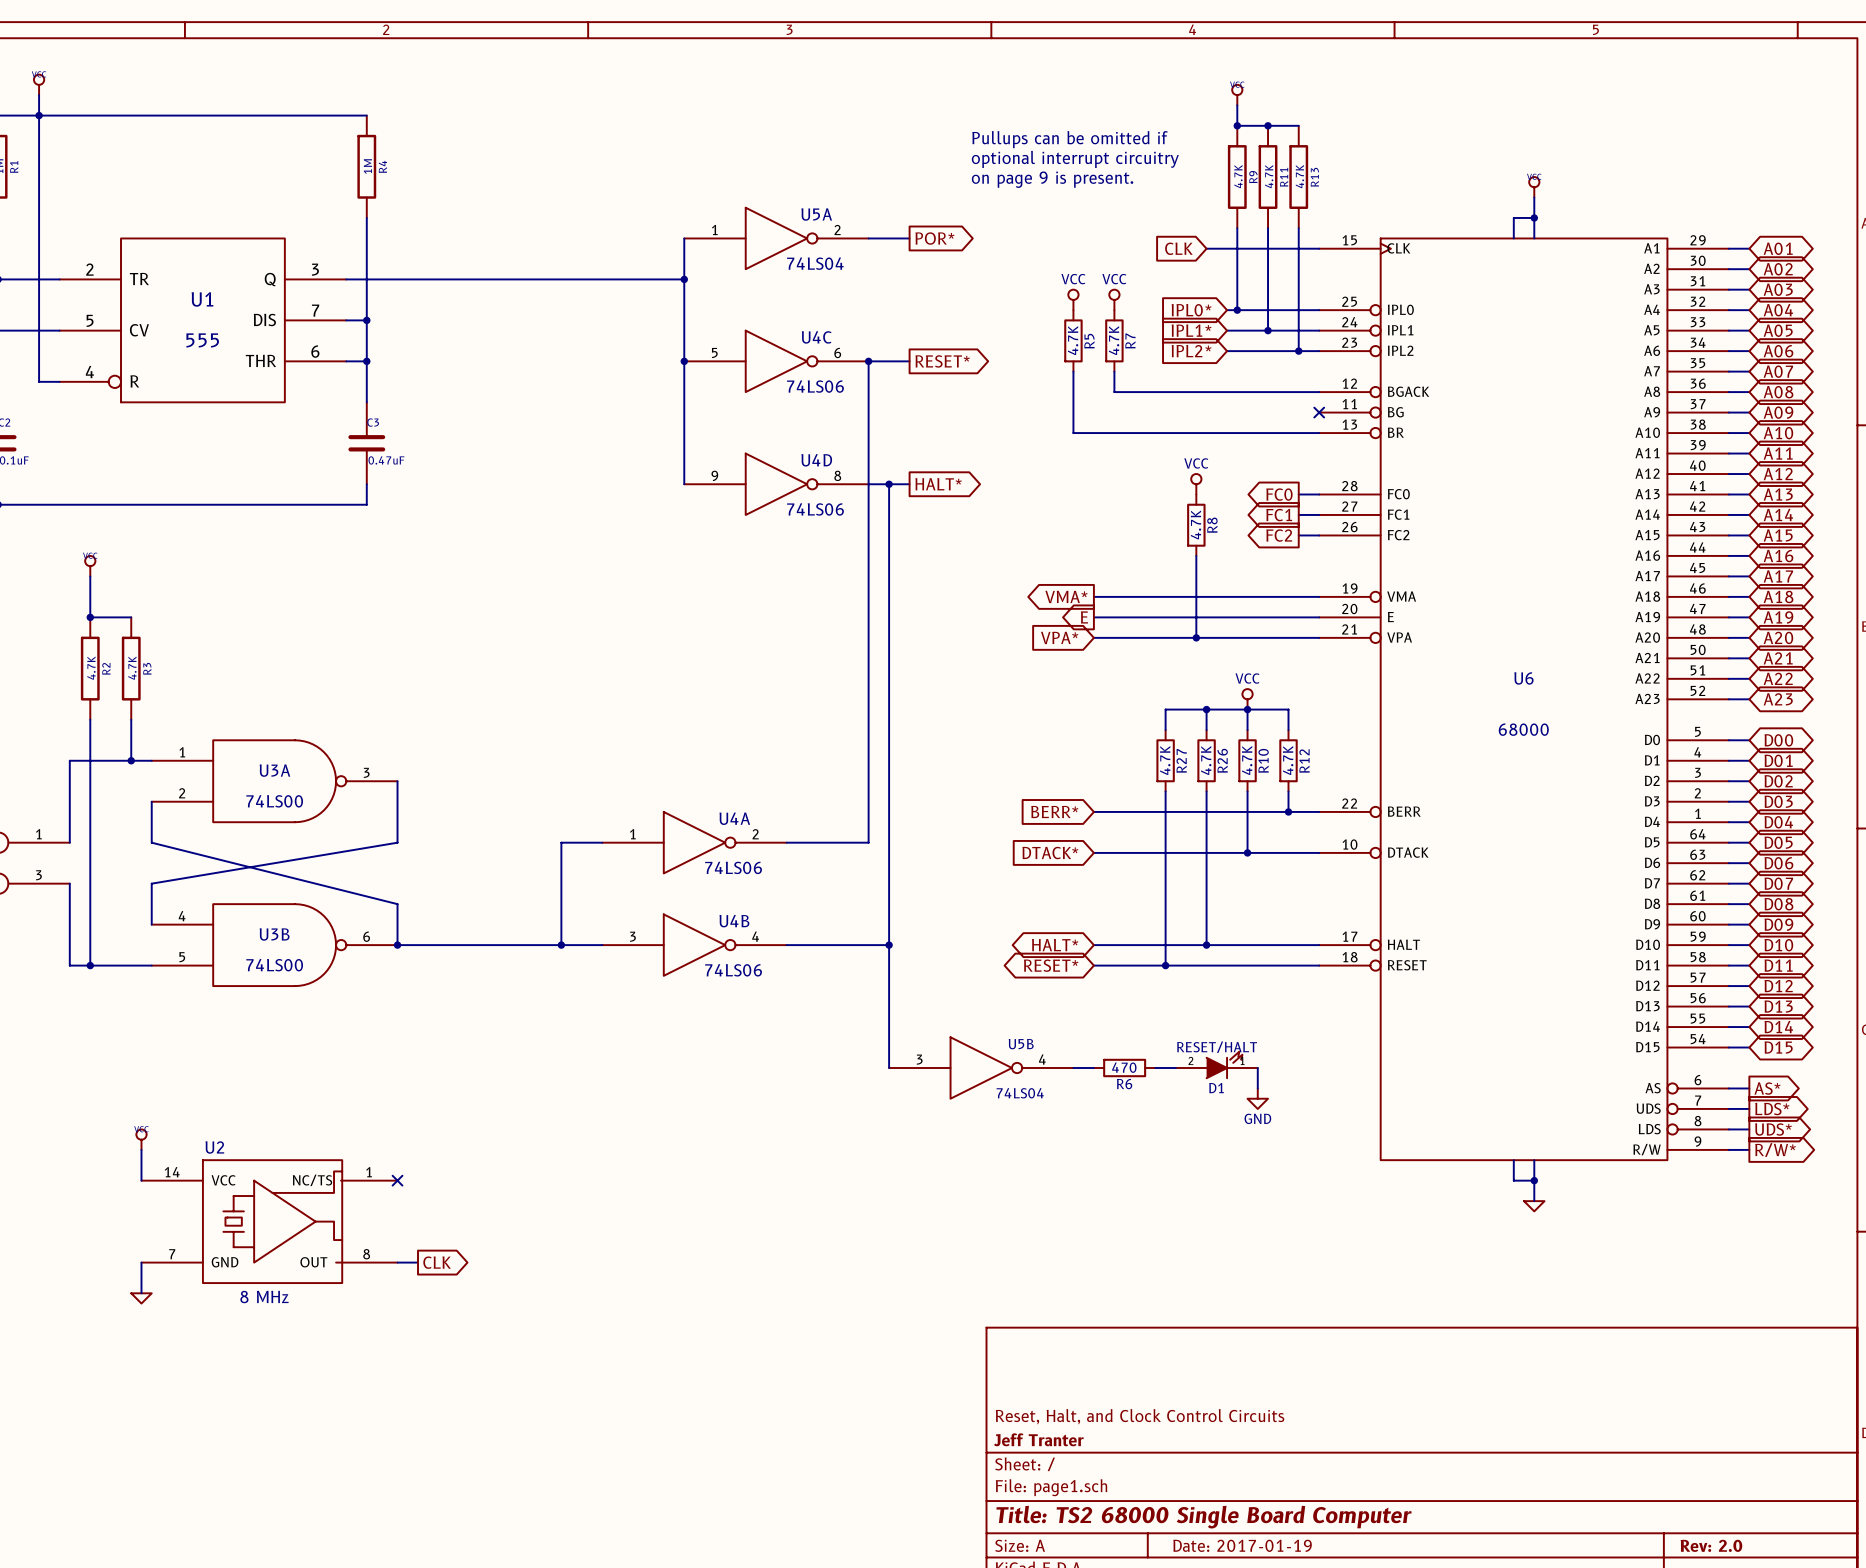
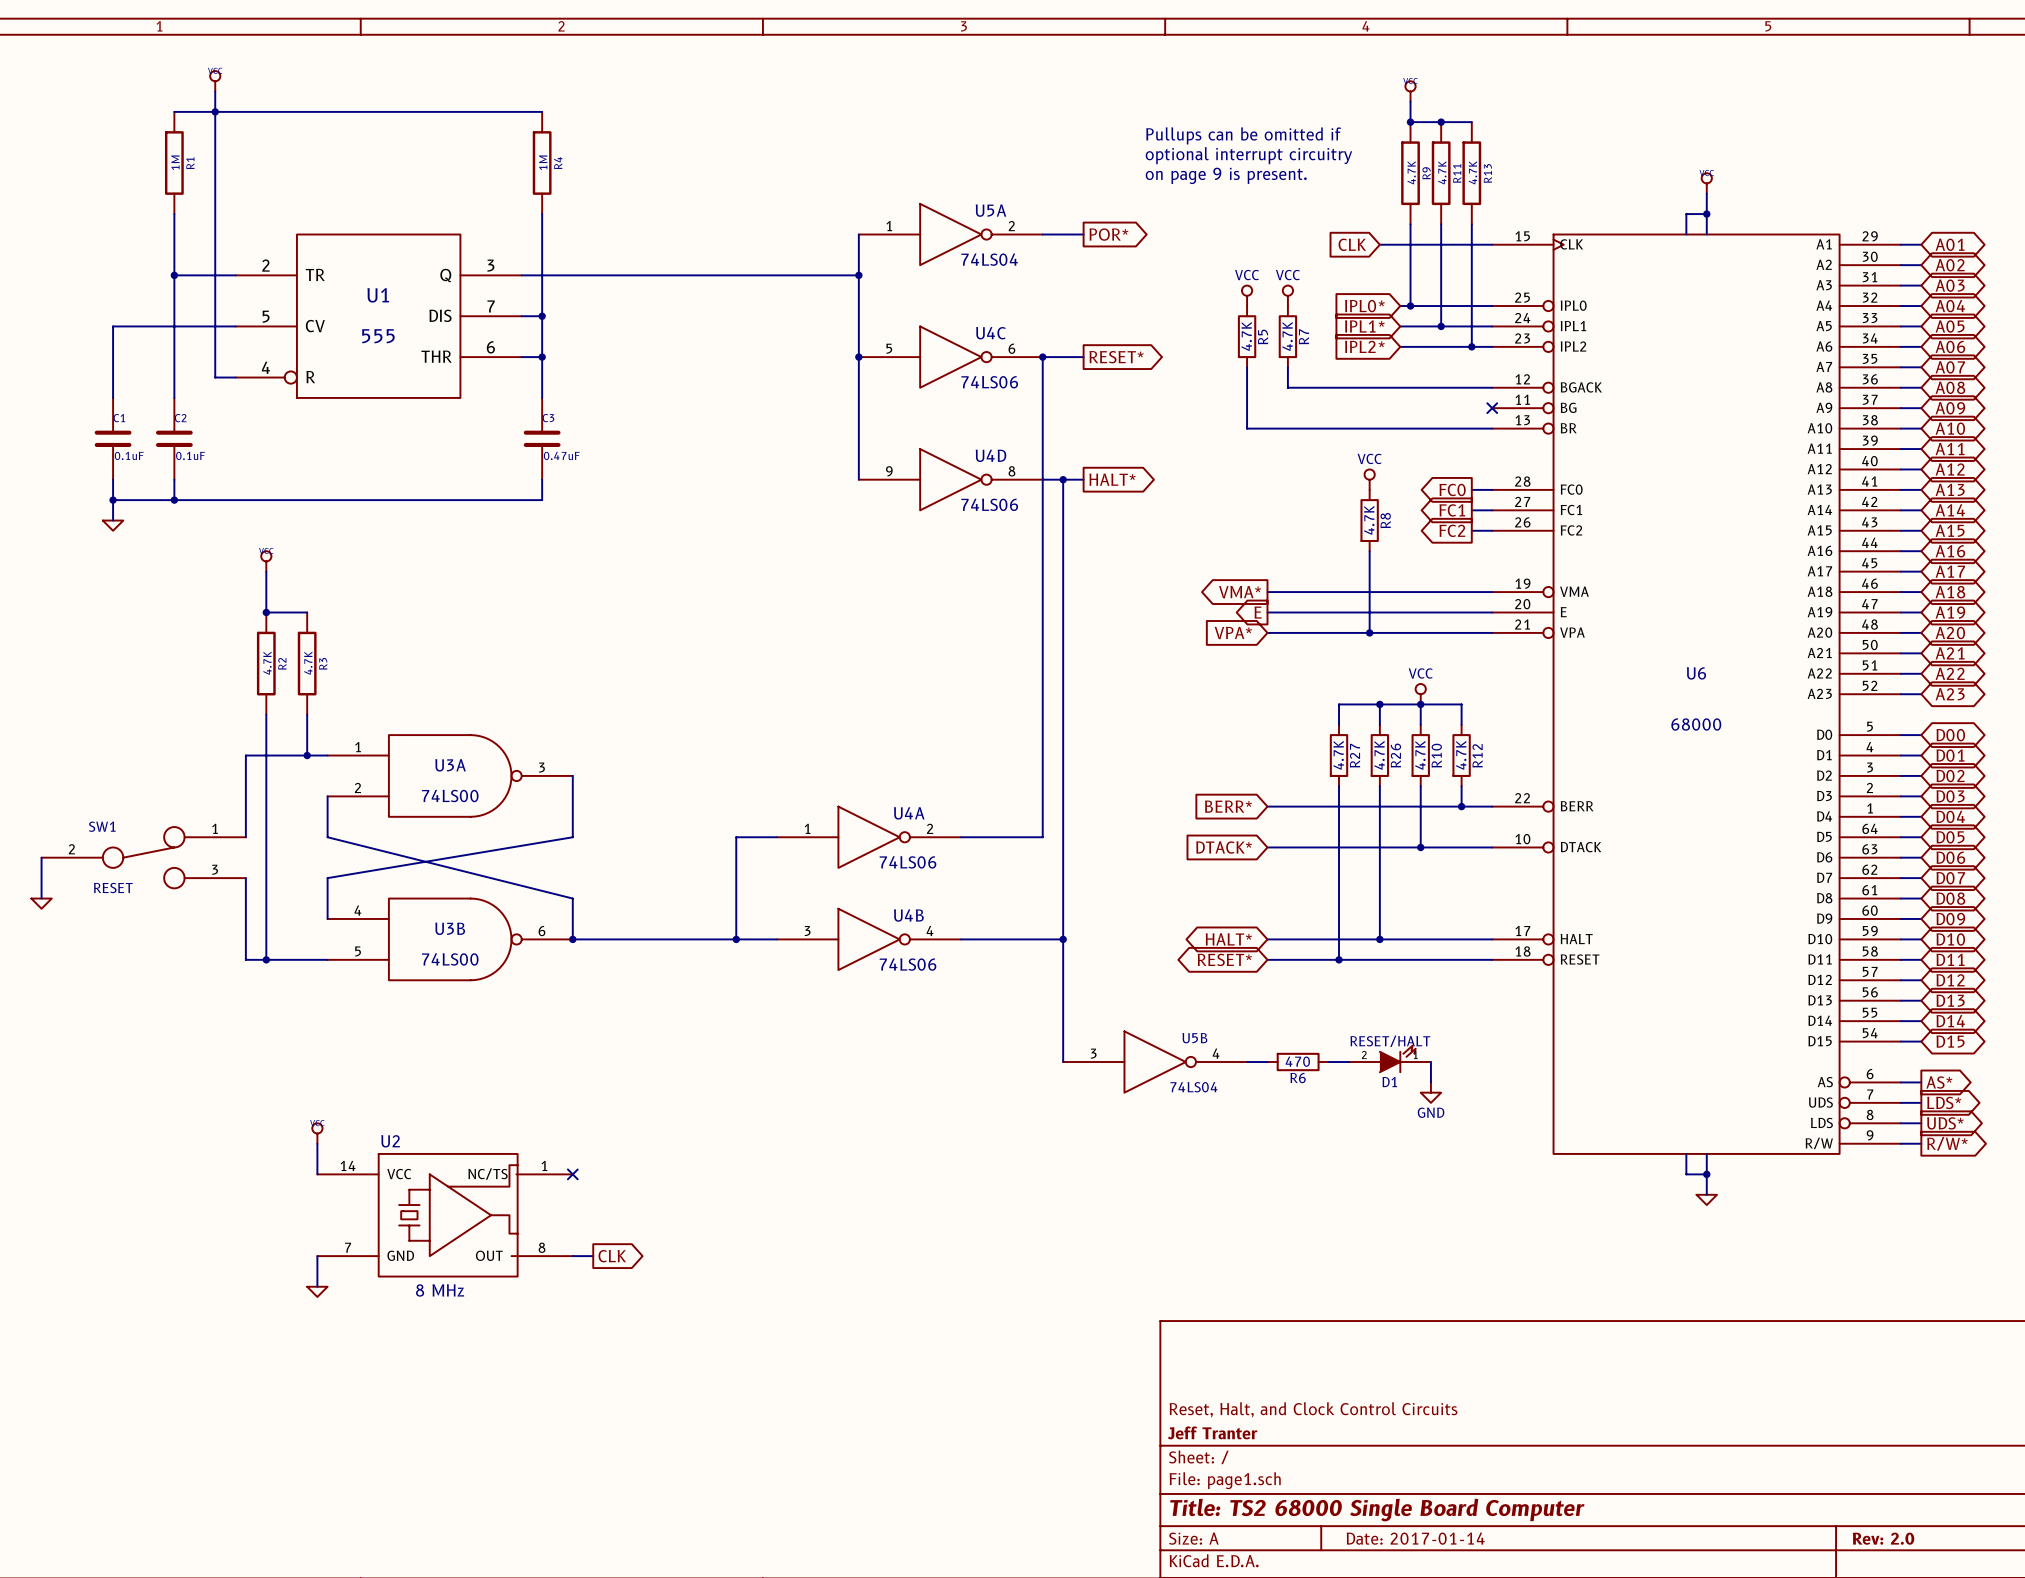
title block: Date: 2017-01-19 (1242, 1545) -> Date: 2017-01-14 (1415, 1538)

